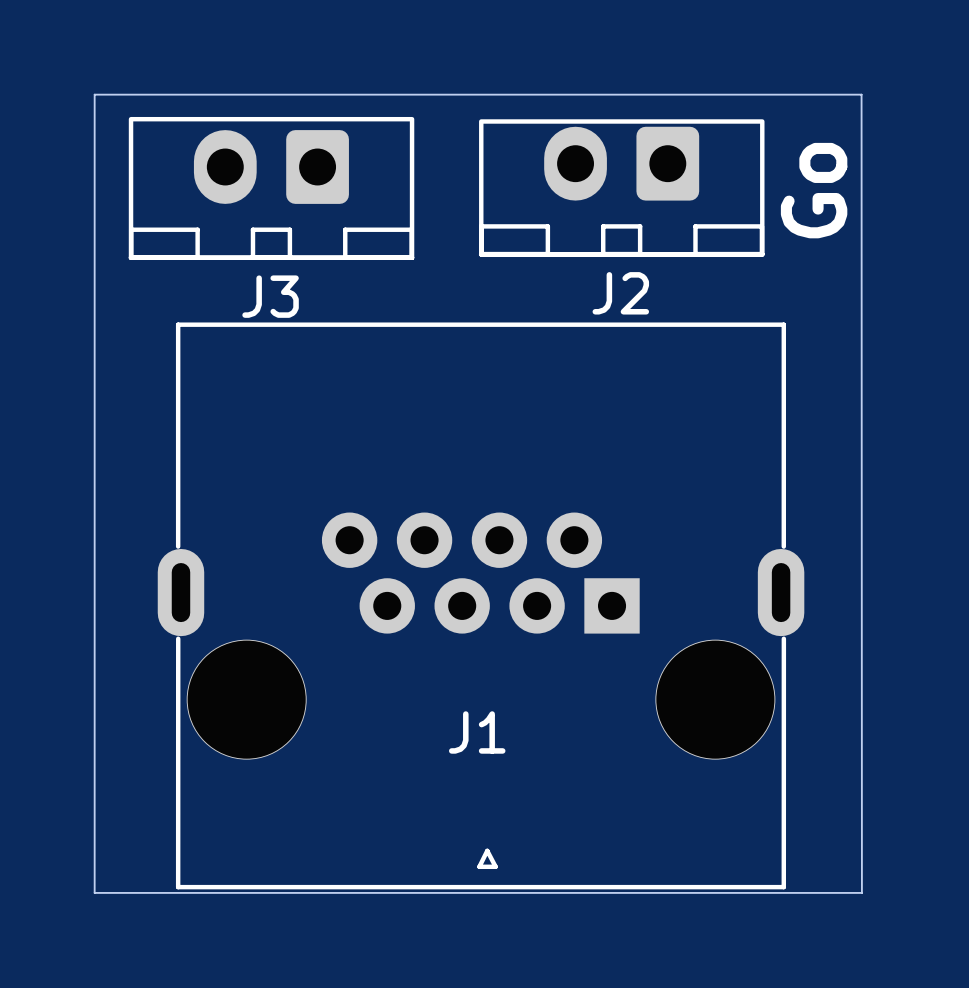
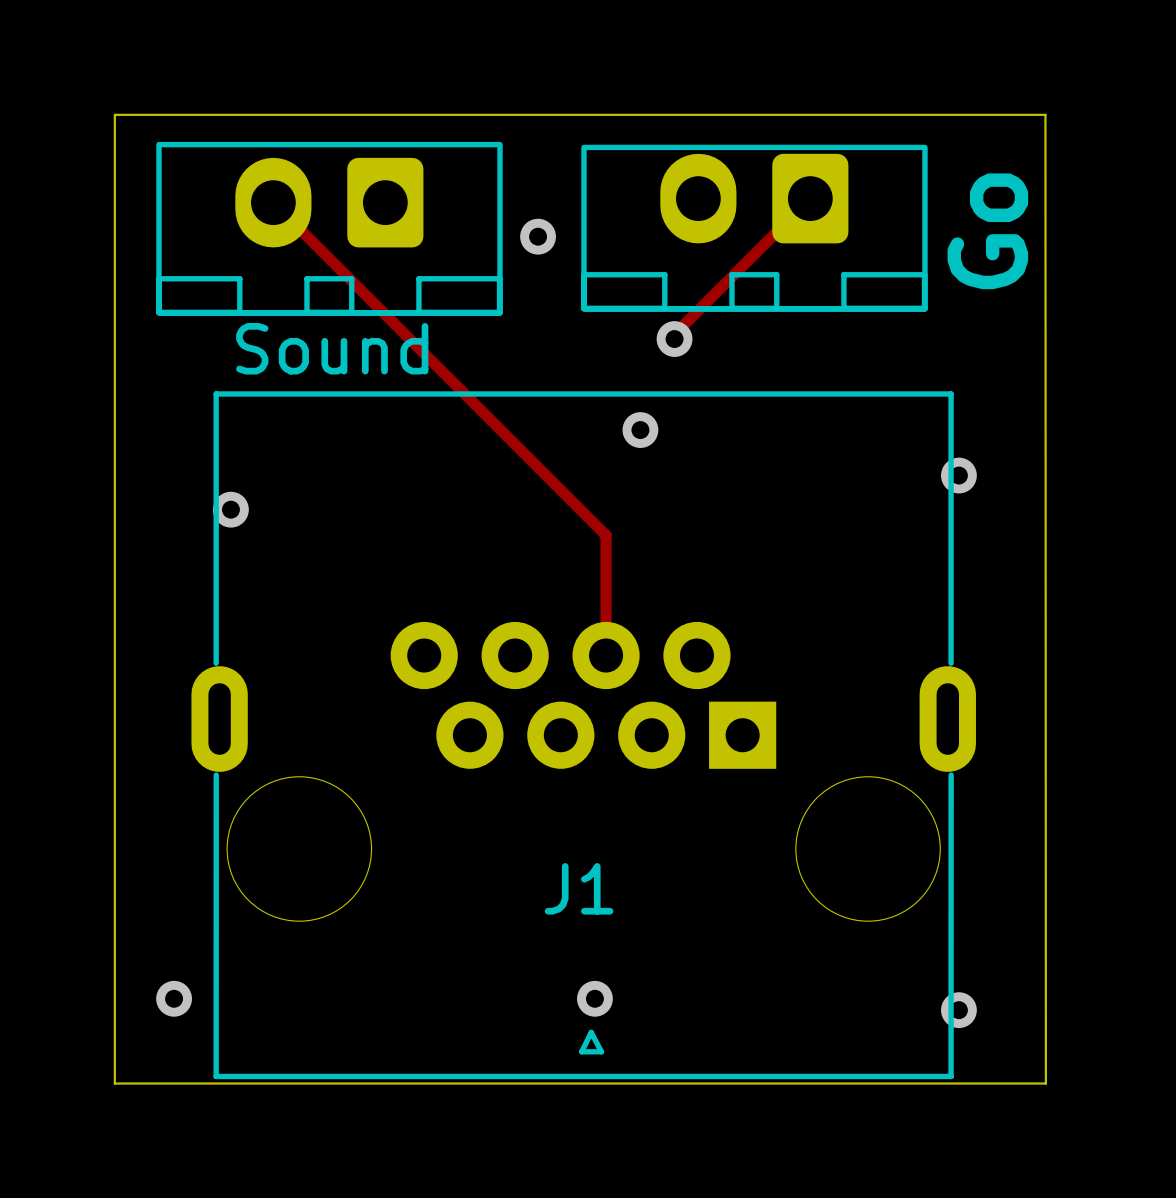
track: none -> (810, 198) (674, 334) (674, 339)
track: none -> (273, 202) (606, 535) (606, 655)
via: none -> (538, 236)
via: none -> (674, 339)
J3 value: none -> Sound (332, 348)
J2 name: J2 (620, 293) -> none
J3 name: J3 (270, 296) -> none
via: none -> (640, 430)
via: none -> (958, 475)
via: none -> (230, 509)
via: none -> (174, 998)
via: none -> (594, 998)
via: none -> (958, 1010)

